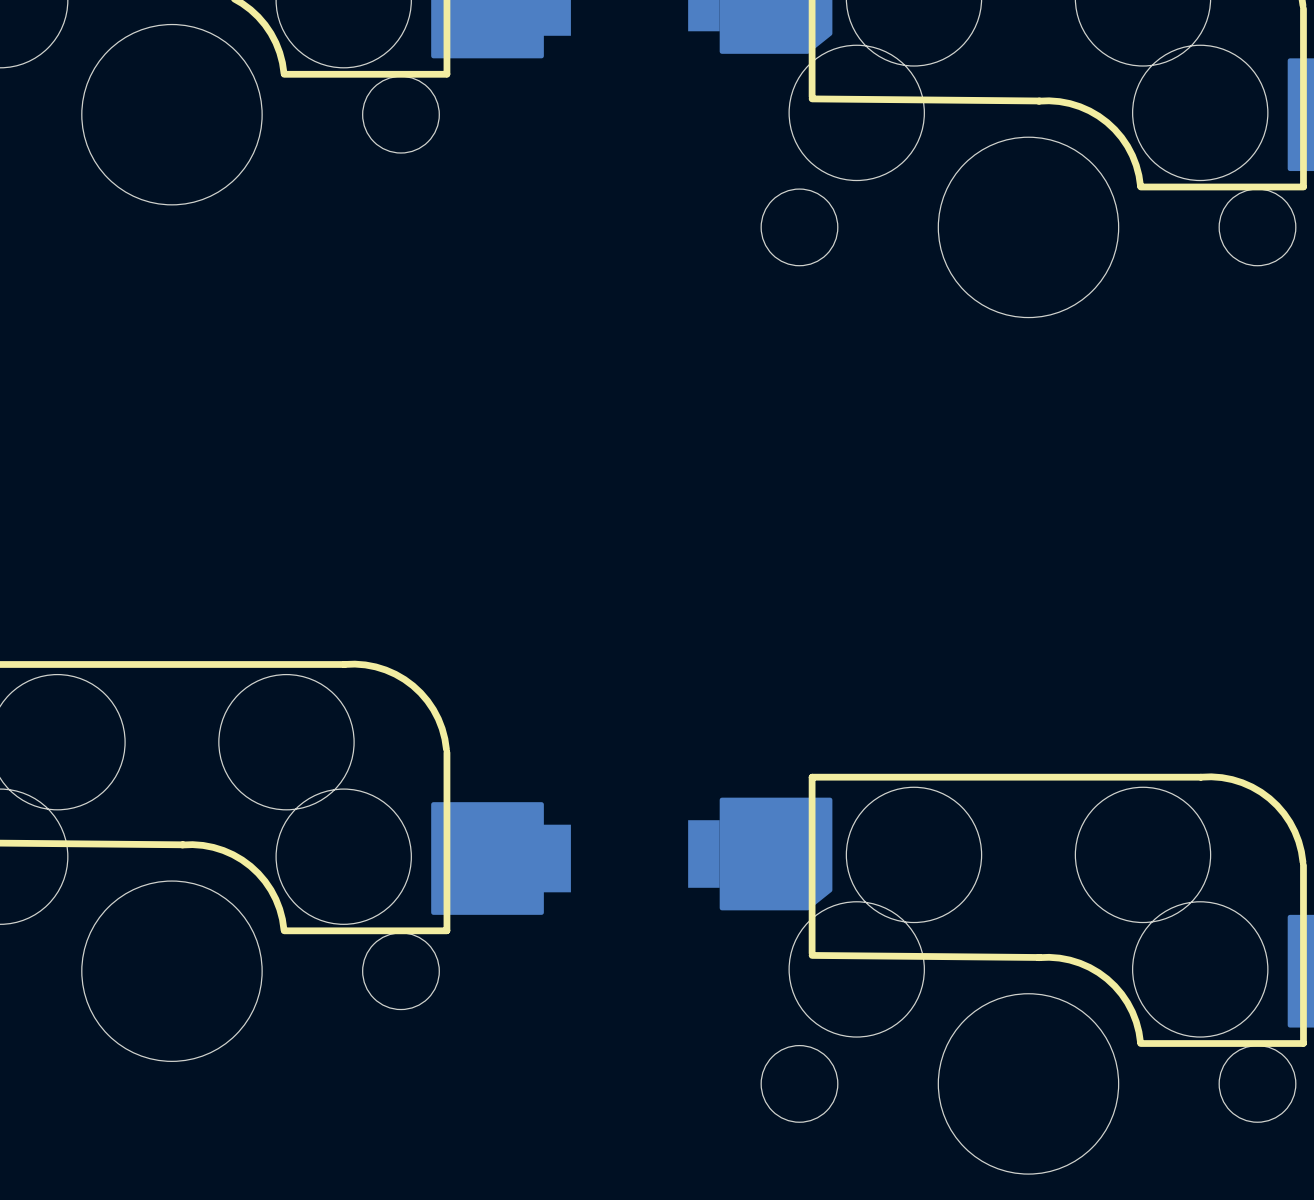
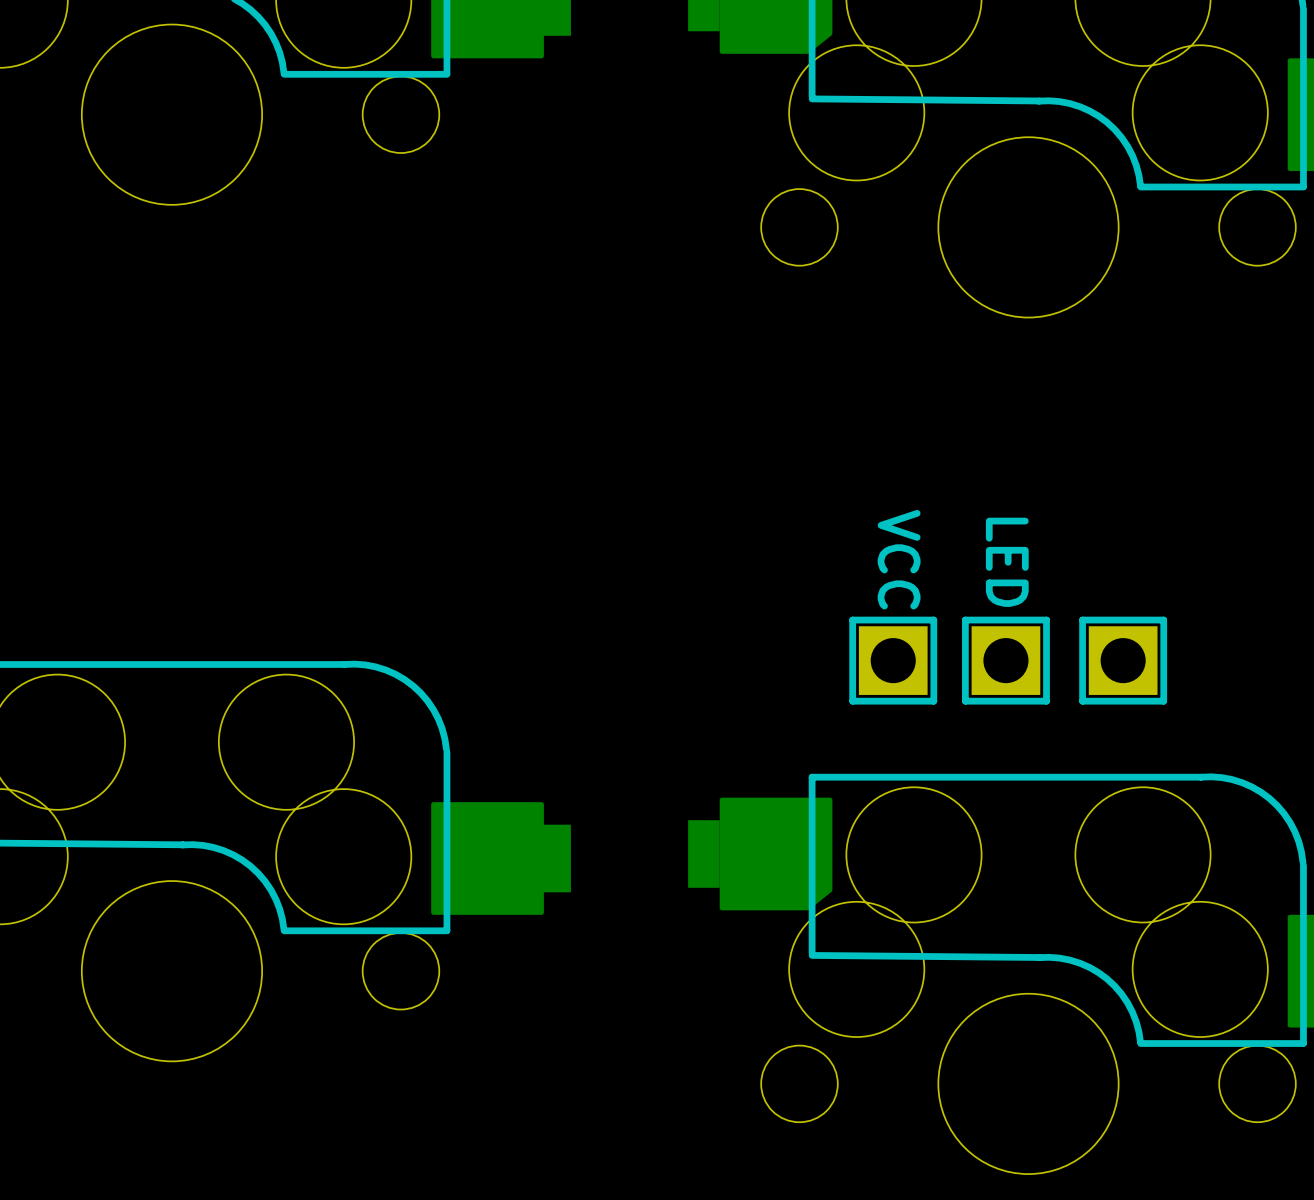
part: none -> (1008, 660)

